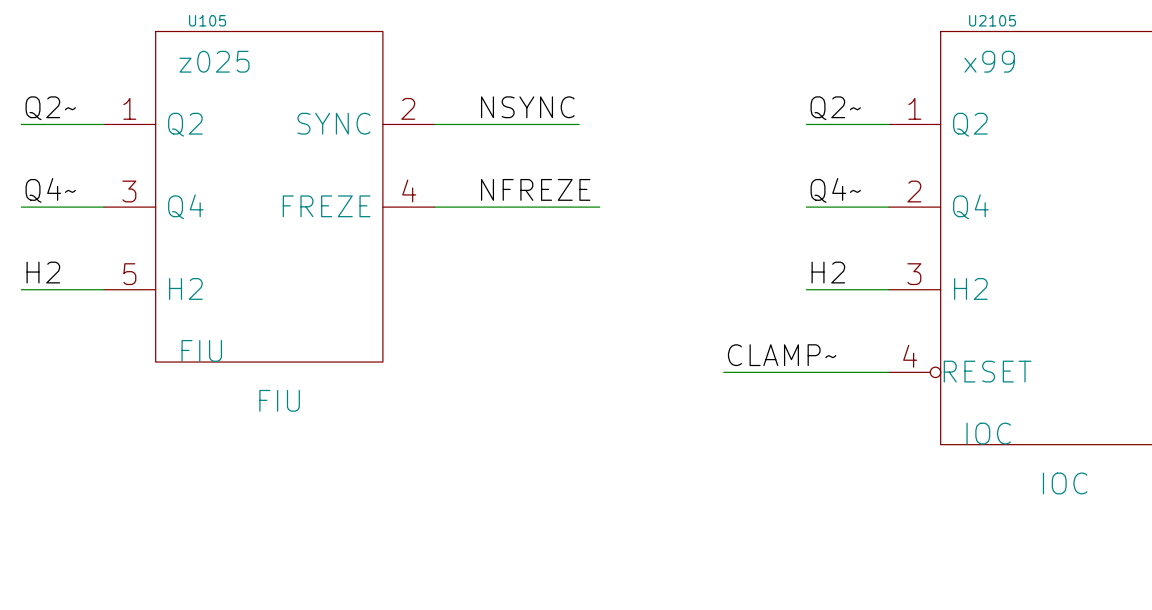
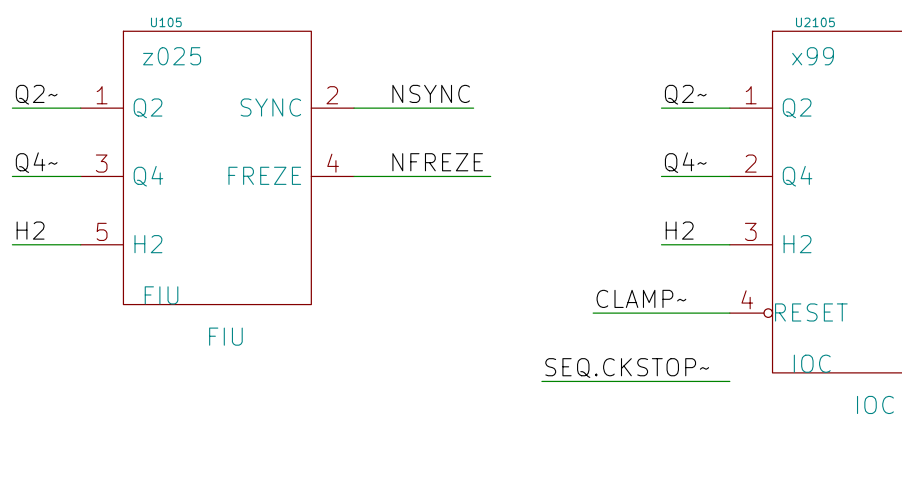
label: none -> SEQ.CKSTOP~ (627, 368)
wire: none -> (541, 381) (729, 381)

